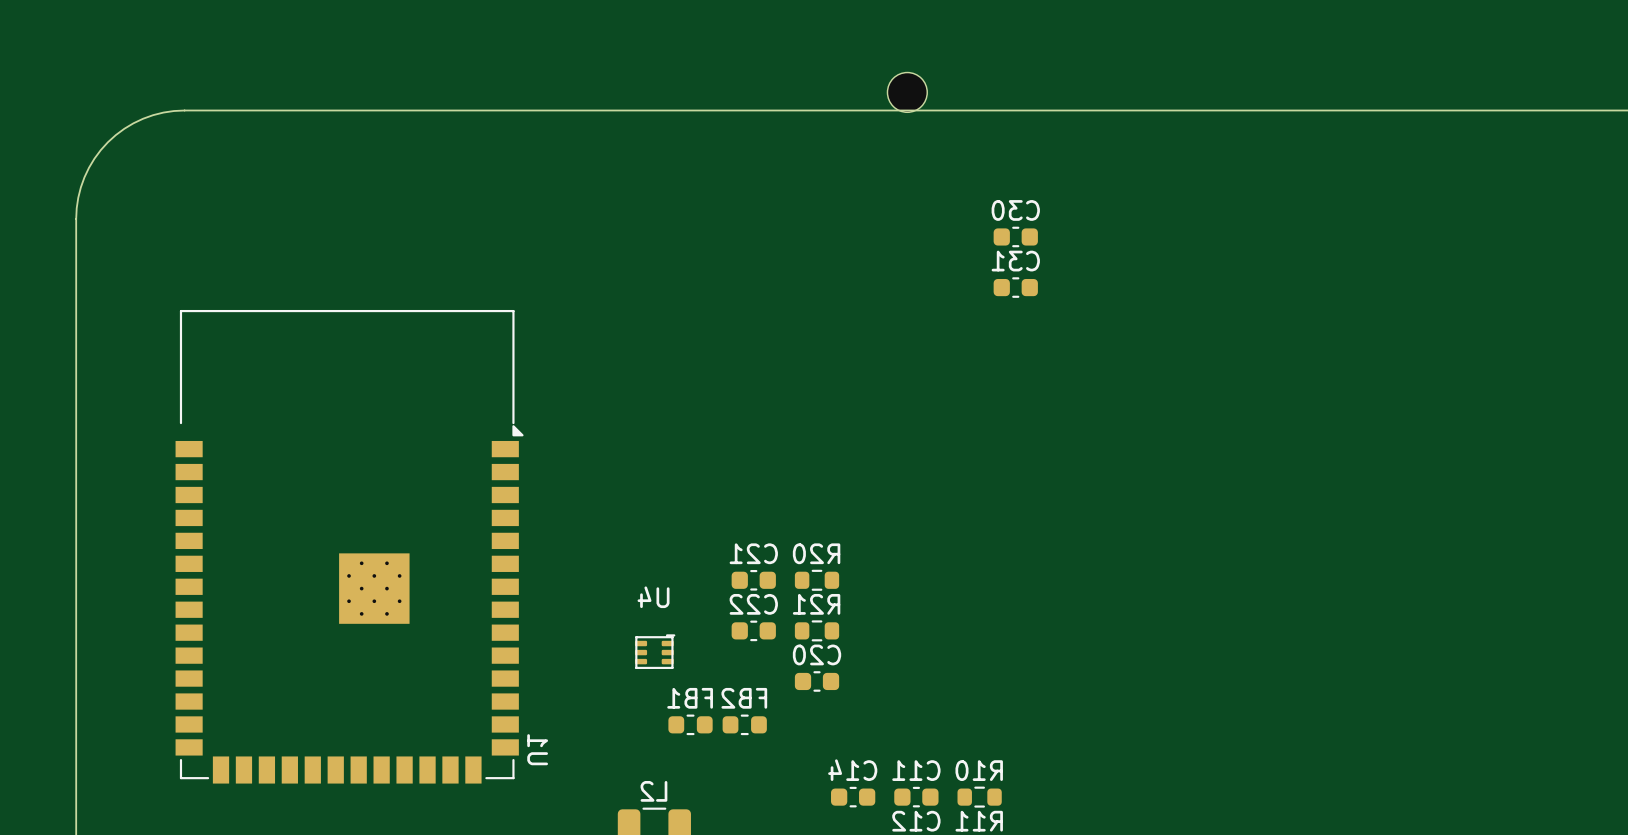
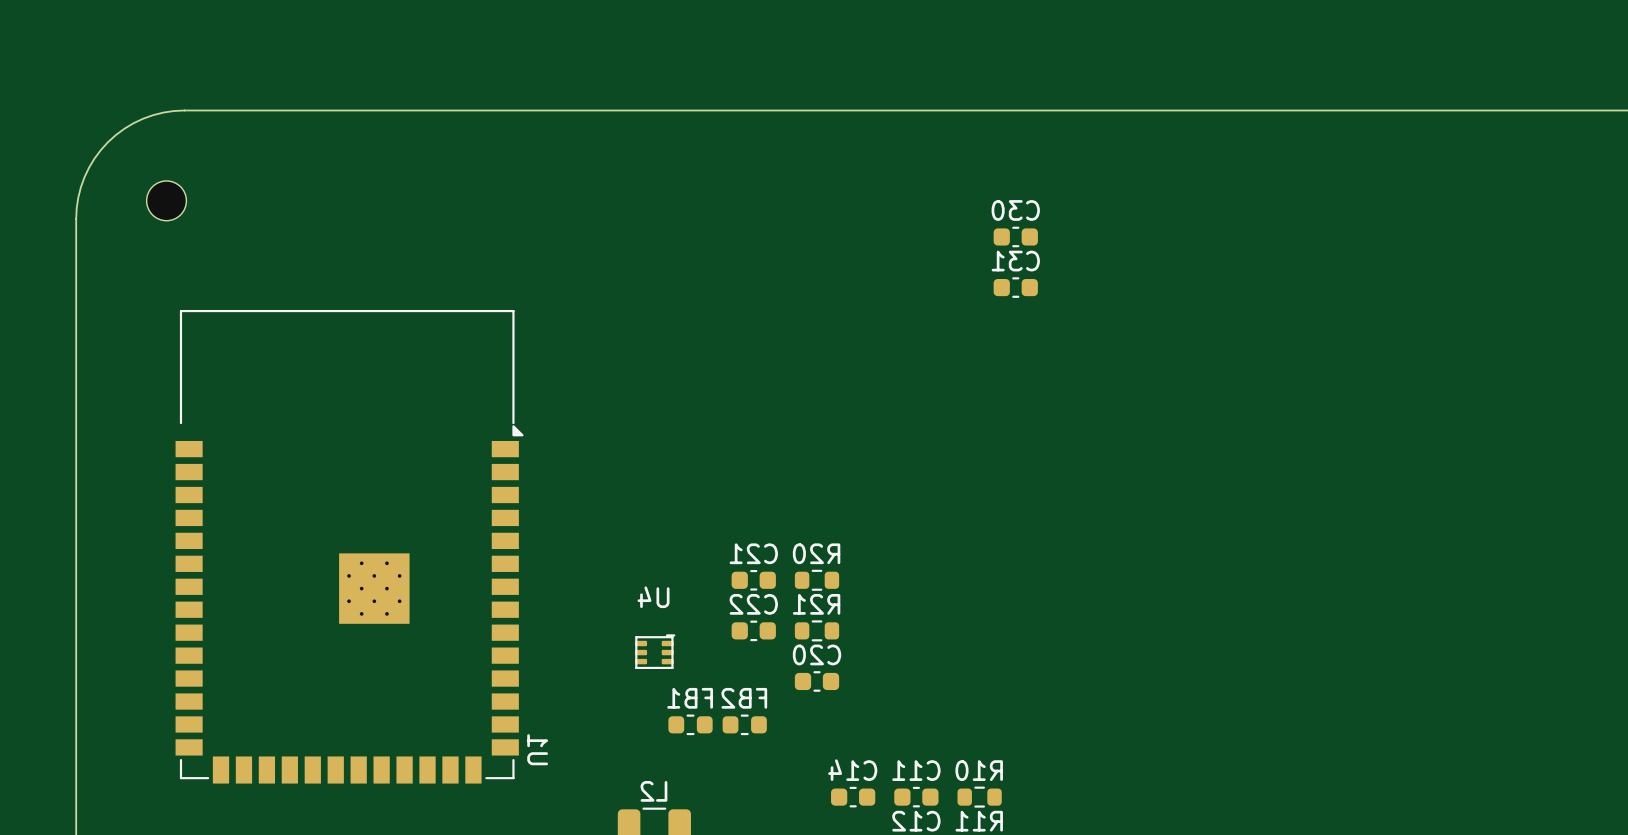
part: (907, 92) -> none
part: none -> (166, 200)

